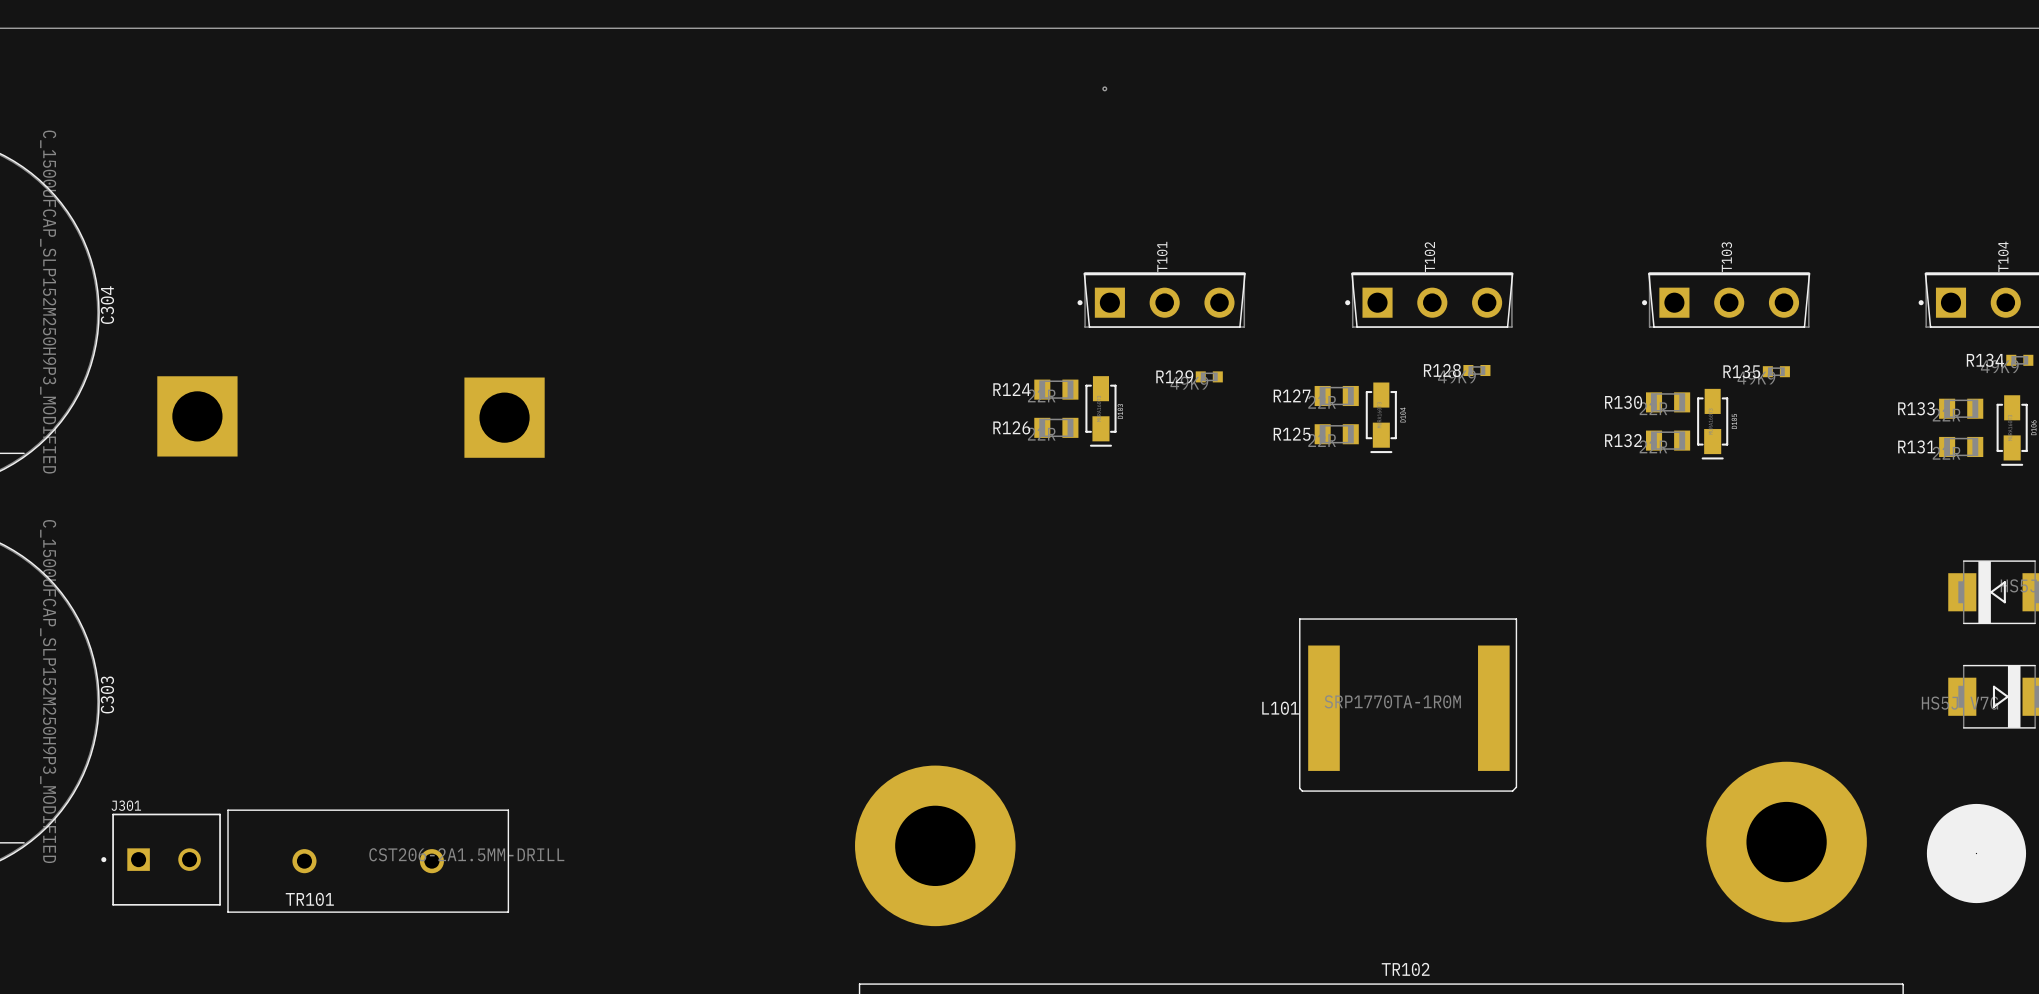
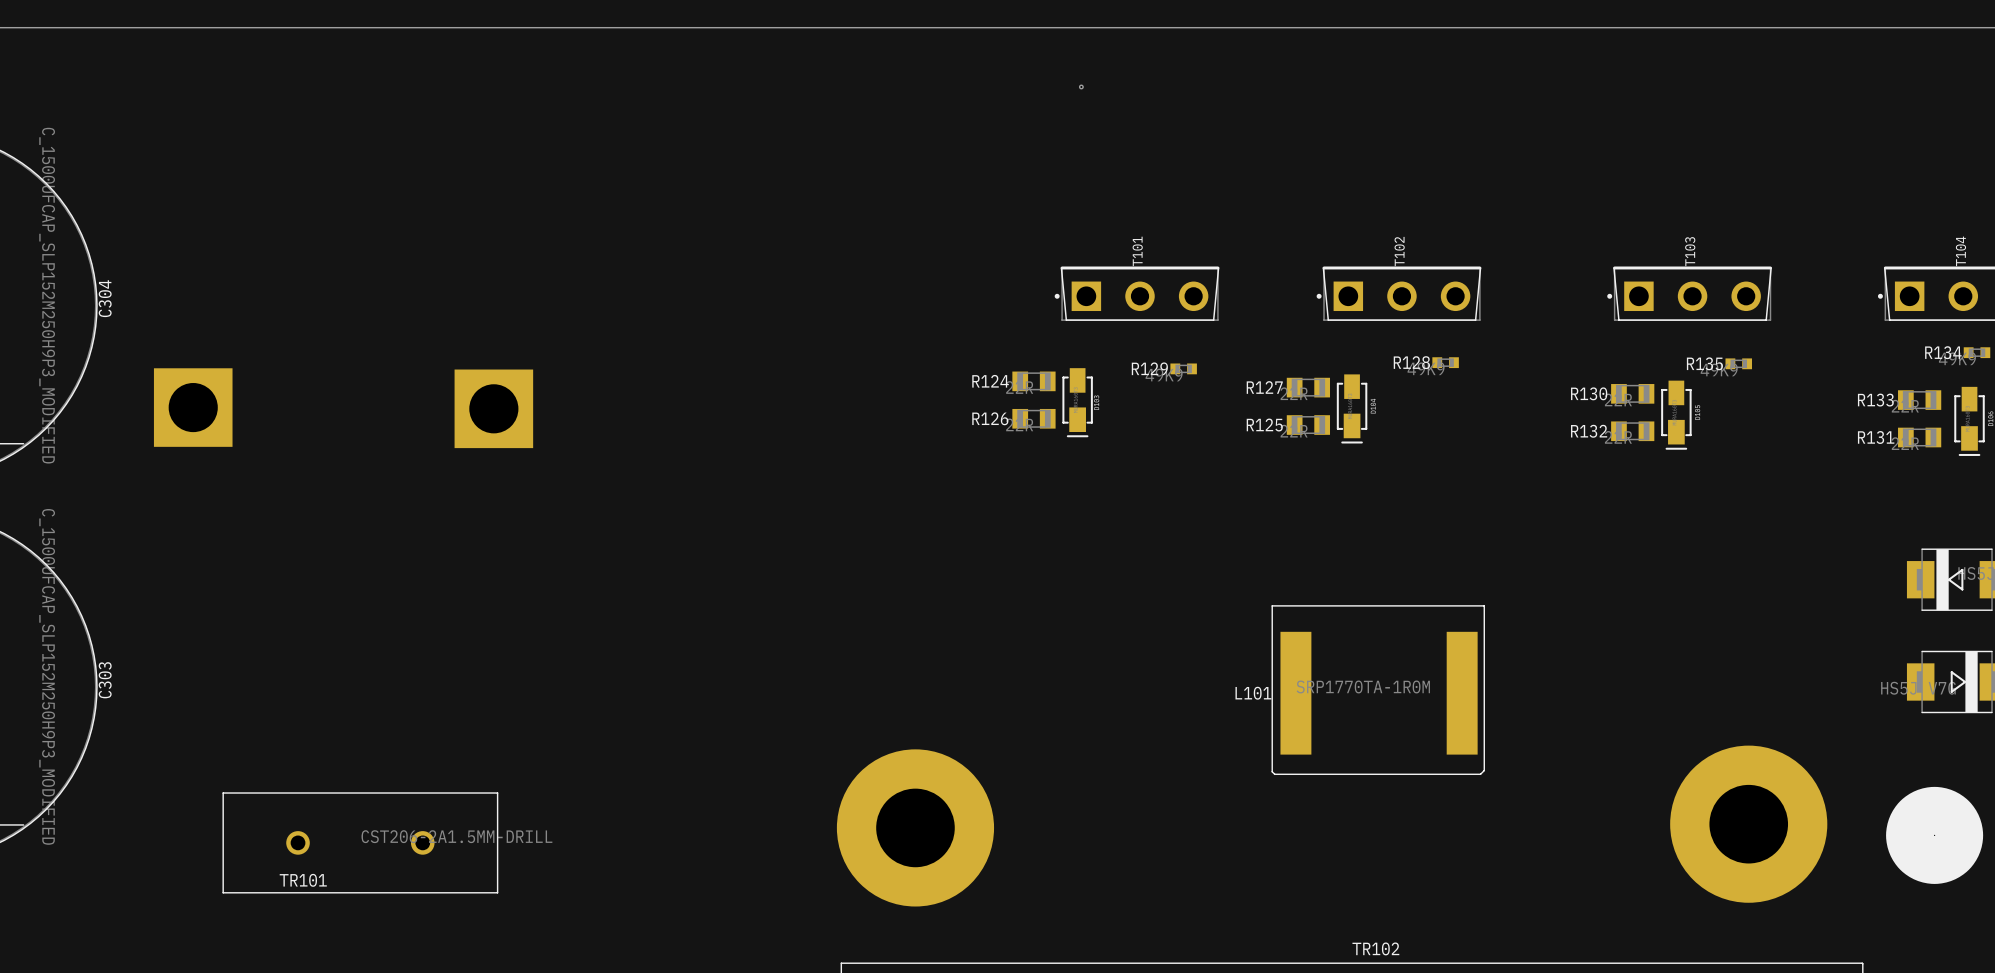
J301: (161, 859) -> none

